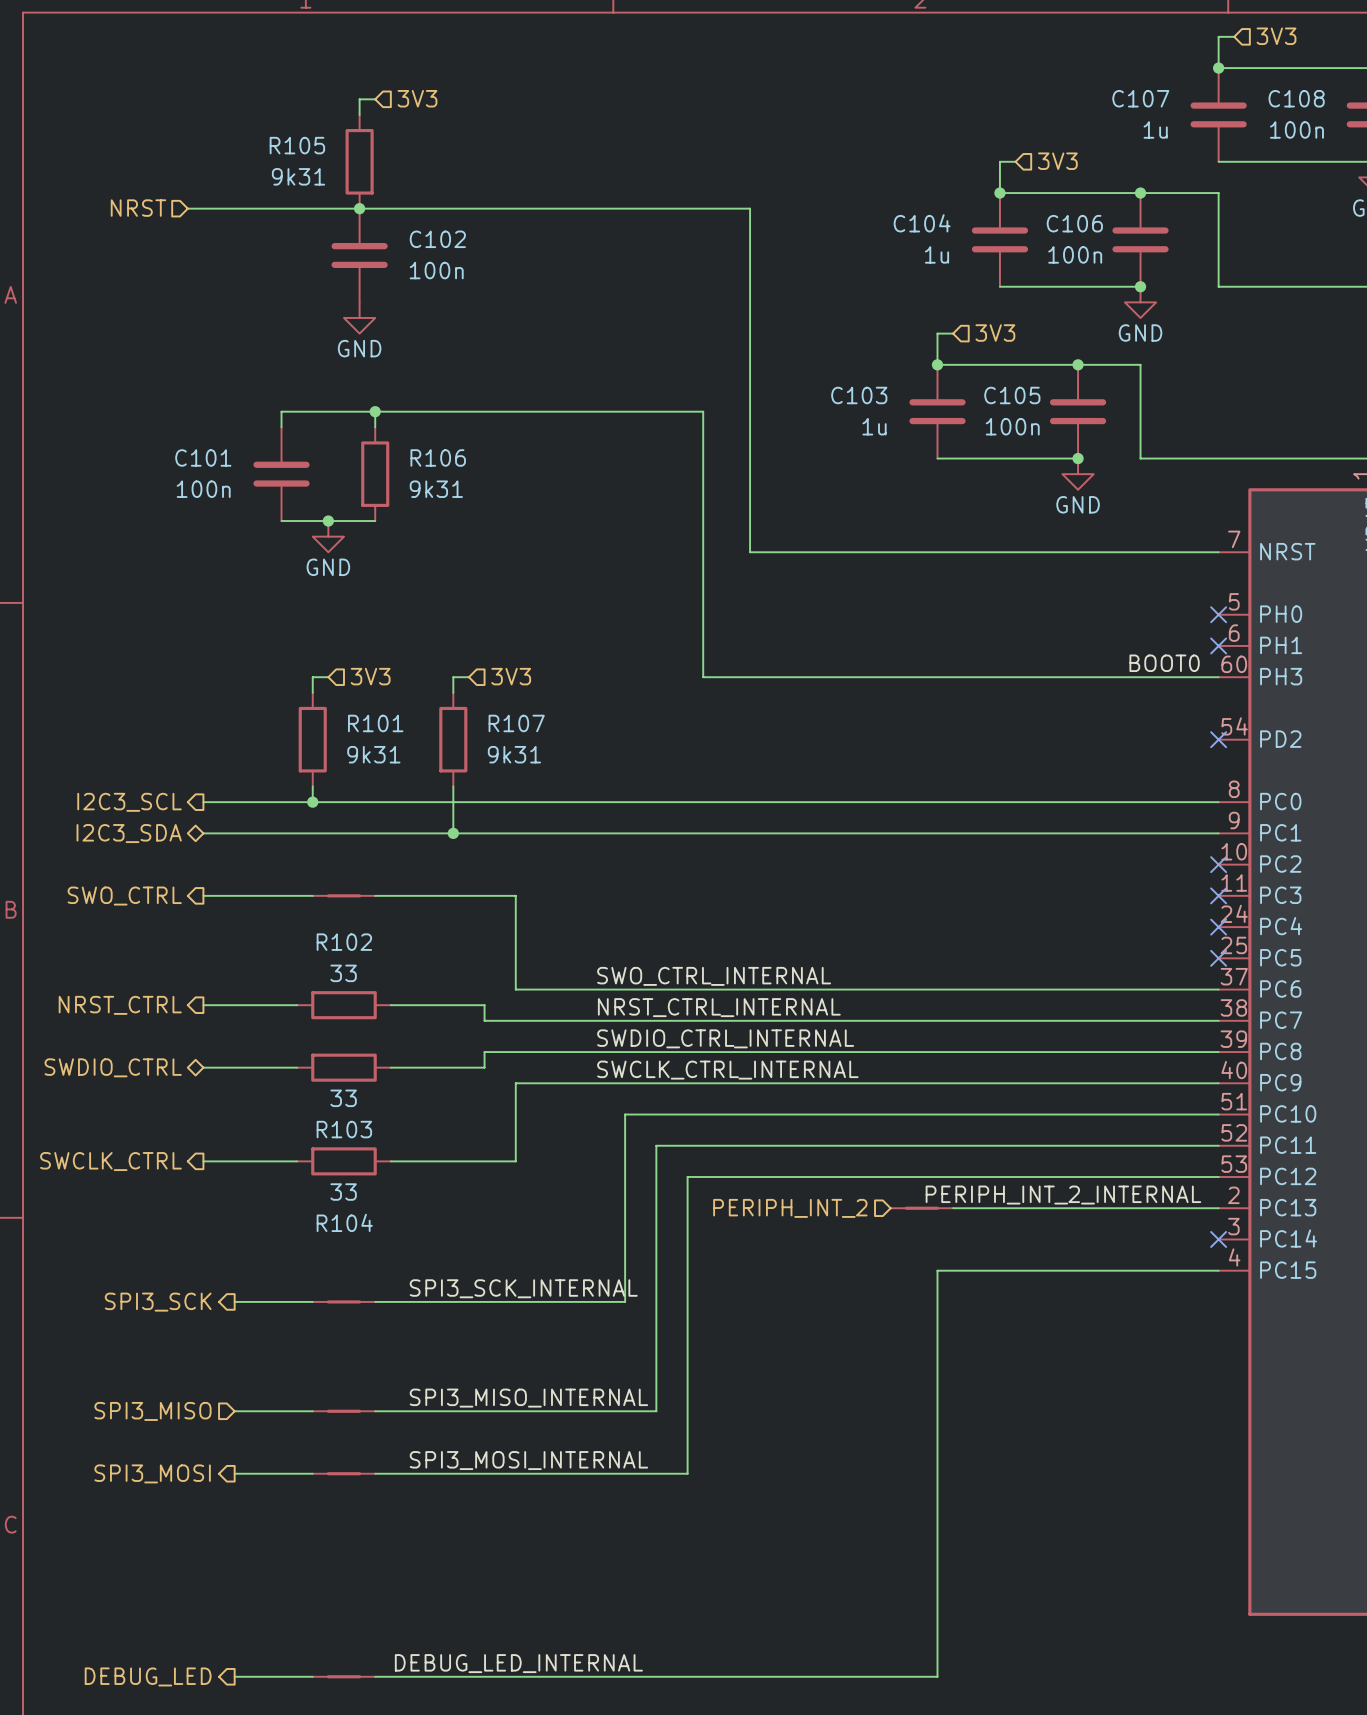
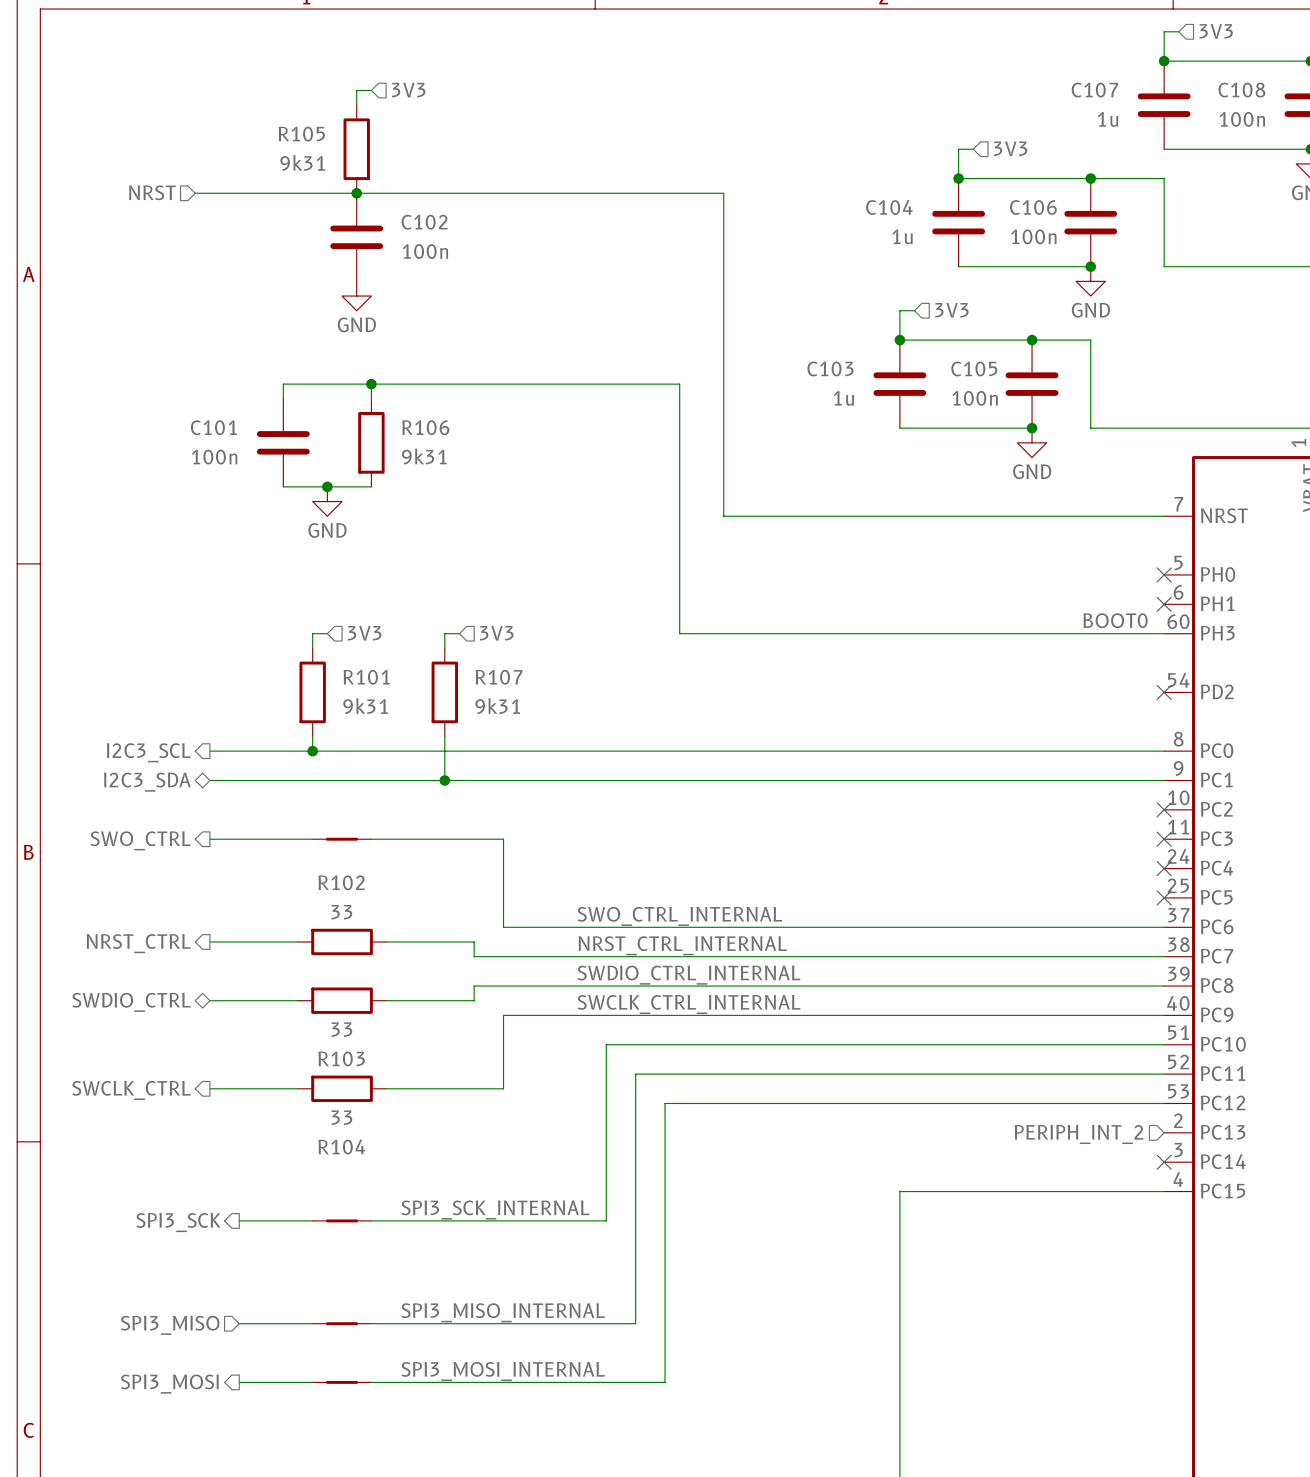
label: PERIPH_INT_2_INTERNAL (1063, 1195) -> none
hierarchical label: PERIPH_INT_2 (790, 1208) -> none
part: (921, 1208) -> none
wire: (953, 1208) (1218, 1208) -> none
hierarchical label: none -> PERIPH_INT_2 (1078, 1134)

